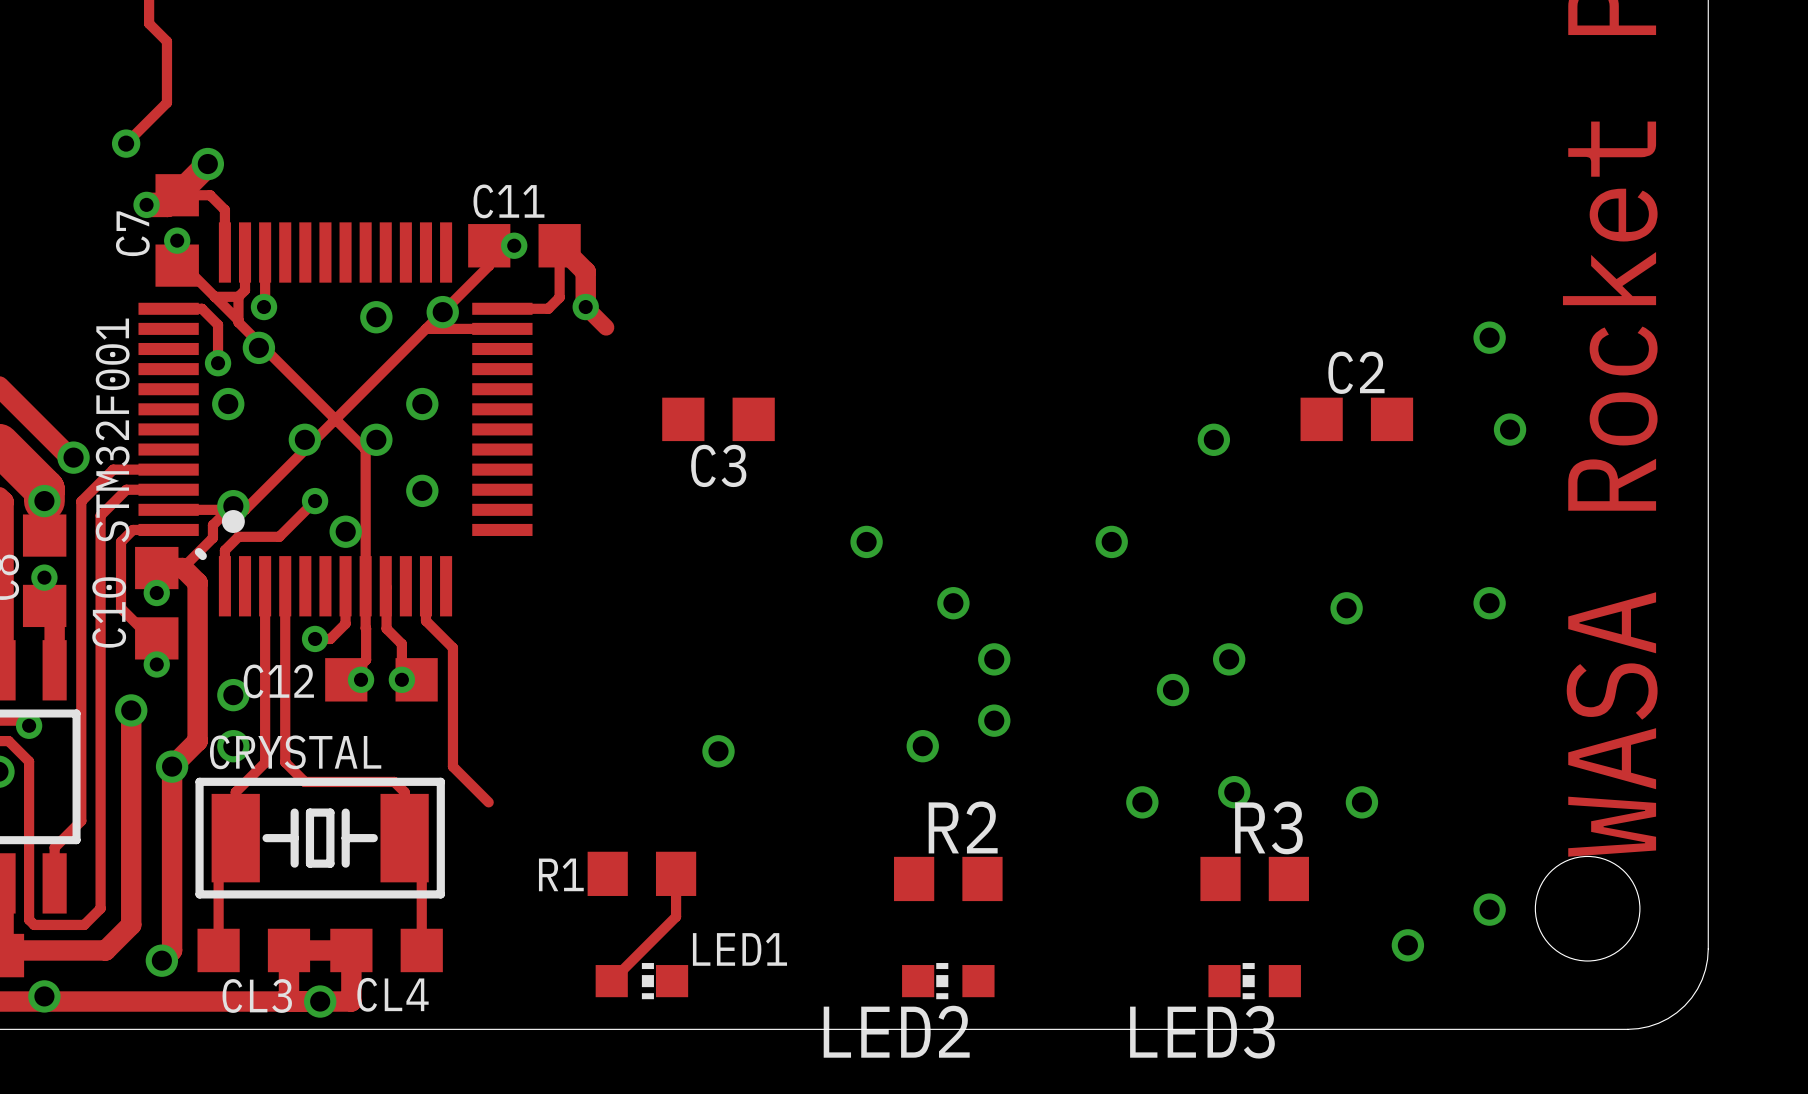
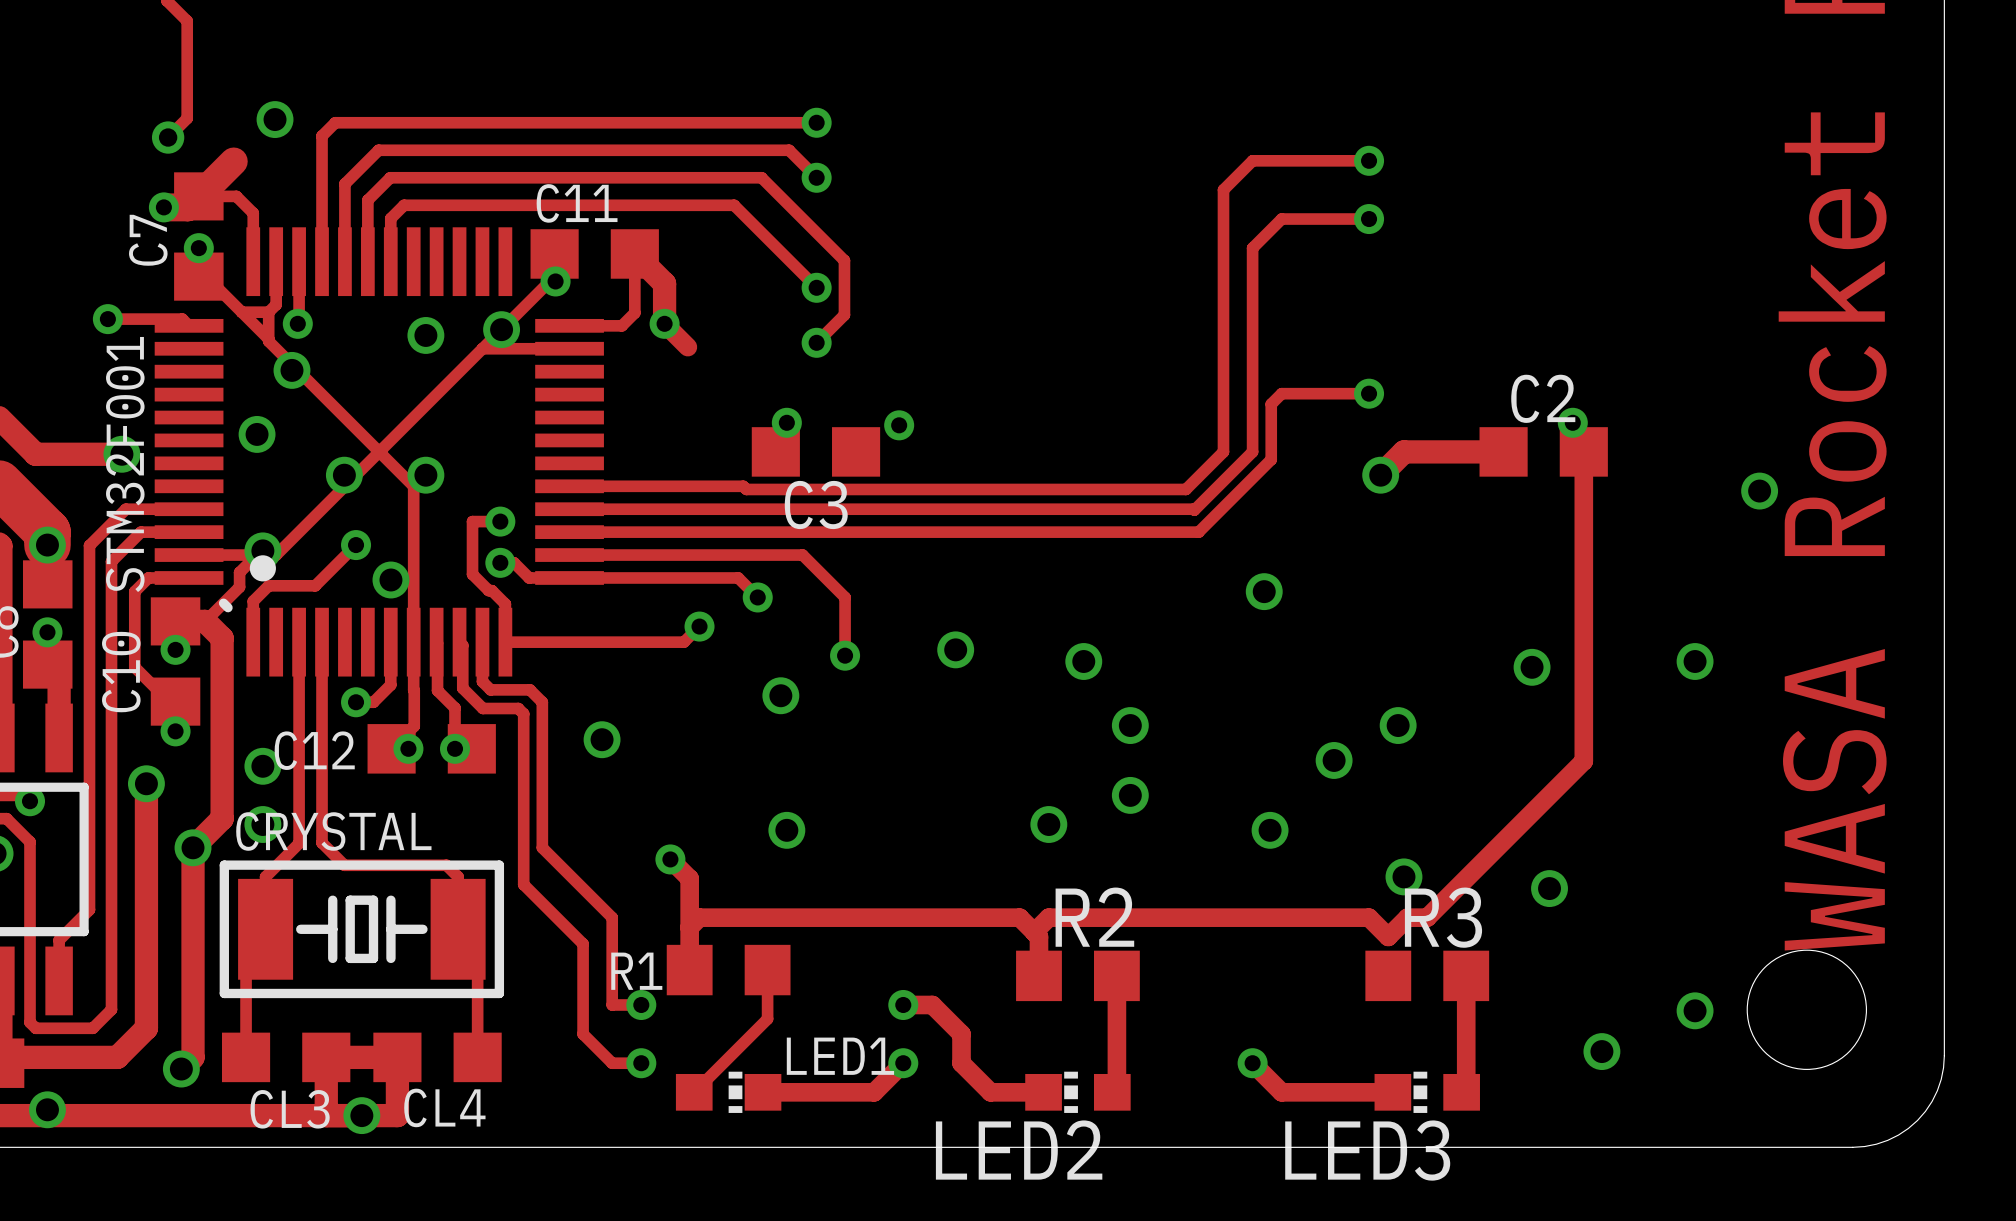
track: (166, 102) (126, 143) -> (187, 90) (187, 118) (168, 137)
track: none -> (816, 122) (335, 122) (322, 136) (322, 261)
via: none -> (816, 122)
via position: (126, 143) -> (168, 137)
via position: (207, 164) -> (275, 119)
track: none -> (1369, 160) (1252, 160) (1223, 189) (1223, 451) (1185, 489) (746, 489) (743, 486) (569, 486)
via: none -> (1369, 160)
track: none -> (816, 177) (789, 150) (378, 150) (344, 183) (344, 261)
via: none -> (816, 177)
track: none -> (1369, 219) (1281, 219) (1252, 248) (1252, 451) (1194, 510) (569, 509)
via: none -> (1369, 219)
via position: (514, 245) -> (555, 281)
track: none -> (367, 261) (367, 200) (390, 177) (761, 177) (844, 260) (844, 314) (816, 342)
track: none -> (390, 261) (390, 218) (404, 205) (734, 205) (816, 287)
via: none -> (816, 287)
via: none -> (107, 319)
track: (168, 308) (201, 308) (218, 324) (218, 363) -> (189, 325) (182, 319) (107, 319)
via: none -> (816, 342)
via: (1489, 337) -> none
via: (218, 363) -> none
track: none -> (1369, 393) (1281, 393) (1271, 404) (1271, 459) (1198, 532) (569, 532)
via: none -> (1369, 393)
via: none -> (786, 422)
track: none -> (1572, 422) (1572, 440) (1583, 451) (1583, 761) (1427, 917) (1407, 917) (1388, 936) (1369, 917) (1048, 917) (1034, 932)
via: none -> (1572, 422)
via: none -> (899, 425)
via: (422, 404) -> none
track: none -> (1503, 451) (1403, 451) (1380, 475)
track: (34, 421) (70, 457) (73, 457) -> (35, 454) (121, 454)
via position: (1510, 429) -> (1759, 491)
via position: (73, 457) -> (121, 454)
track: none -> (500, 521) (472, 521) (472, 574) (505, 604) (505, 642) (683, 642) (699, 626)
via: none -> (500, 521)
via: (422, 490) -> none
track: none -> (569, 555) (802, 555) (845, 597) (845, 655)
track: none -> (500, 562) (514, 562) (529, 577) (738, 577) (757, 597)
via: none -> (500, 562)
via position: (866, 541) -> (955, 649)
via: none -> (757, 597)
via: none -> (699, 626)
track: none -> (459, 642) (462, 645) (462, 688) (482, 708) (518, 708) (523, 713) (523, 884) (583, 944) (583, 1034) (612, 1063) (641, 1063)
via: none -> (845, 655)
track: (433, 628) (452, 647) (452, 766) (488, 802) -> (490, 689) (529, 689) (542, 702) (542, 847) (612, 917) (612, 1004) (641, 1004)
via: none -> (780, 695)
via: none -> (602, 739)
via position: (718, 751) -> (786, 830)
track: none -> (670, 859) (689, 878) (689, 970)
via: none -> (670, 859)
via position: (1142, 802) -> (1270, 830)
track: none -> (689, 927) (699, 917) (1019, 917) (1038, 936) (1038, 975)
track: none -> (1116, 975) (1116, 1087) (1112, 1092)
track: none -> (1466, 975) (1466, 1087) (1461, 1092)
via: none -> (641, 1004)
track: none -> (903, 1004) (932, 1004) (961, 1034) (961, 1063) (990, 1092) (1043, 1092)
via: none -> (903, 1004)
via: none -> (641, 1063)
track: none -> (903, 1063) (874, 1092) (763, 1092)
via: none -> (903, 1063)
track: none -> (1252, 1063) (1281, 1092) (1392, 1092)
via: none -> (1252, 1063)

